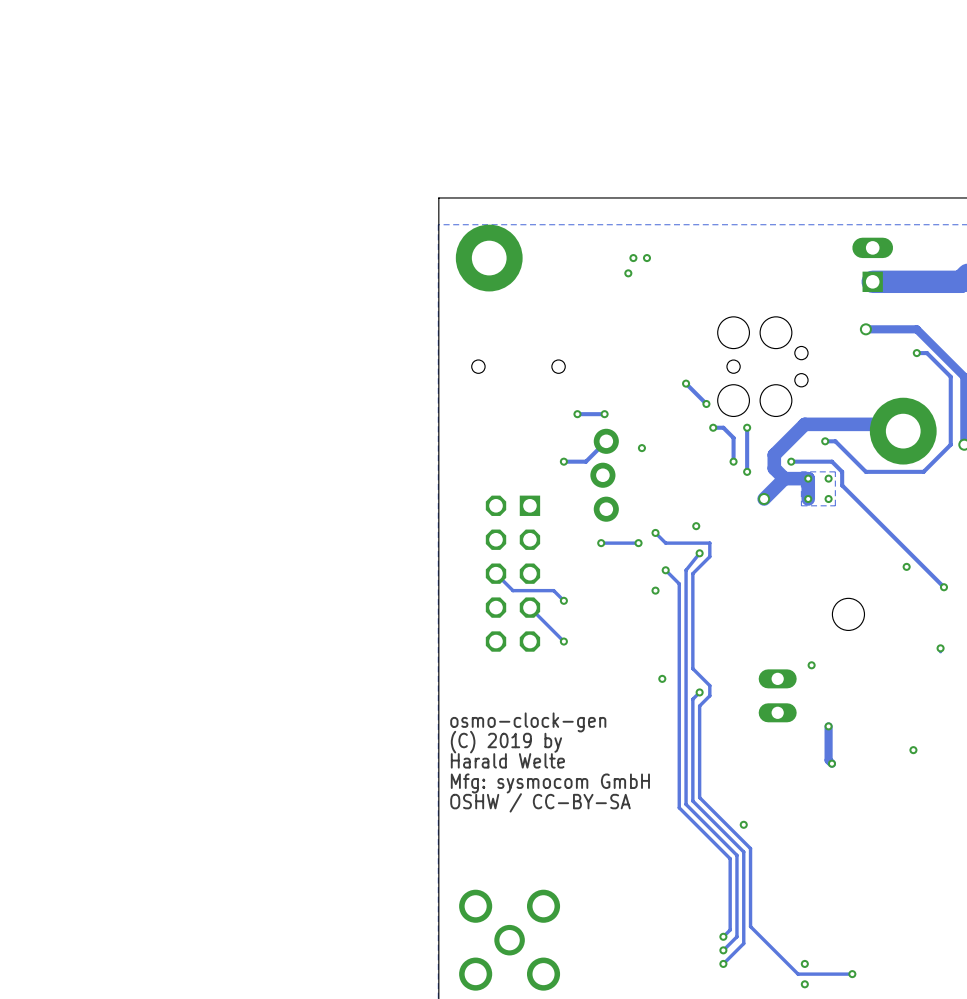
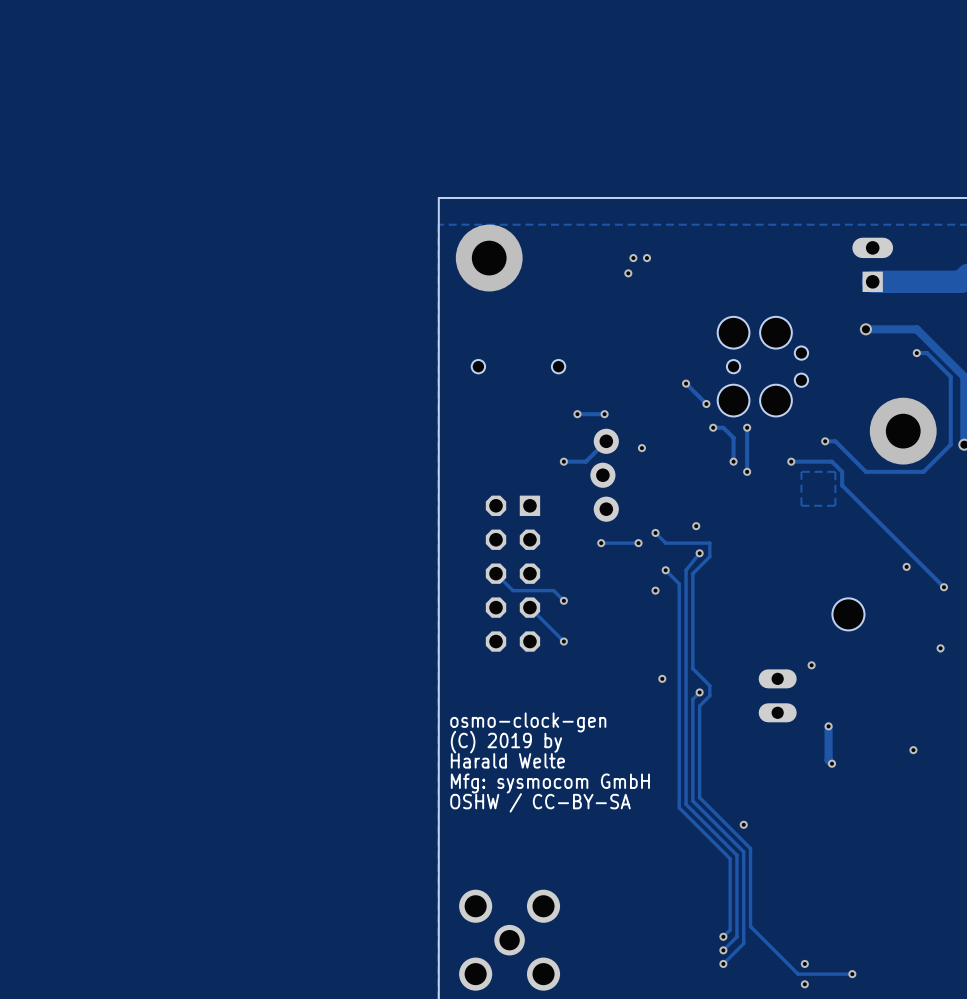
track: (896, 424) (804, 424) (774, 454) (774, 468) (784, 478) -> none
track: (784, 478) (808, 478) (808, 499) -> none
track: (784, 478) (764, 499) -> none
via: (808, 478) -> none
via: (828, 478) -> none
via: (764, 499) -> none
via: (808, 499) -> none
via: (828, 499) -> none

